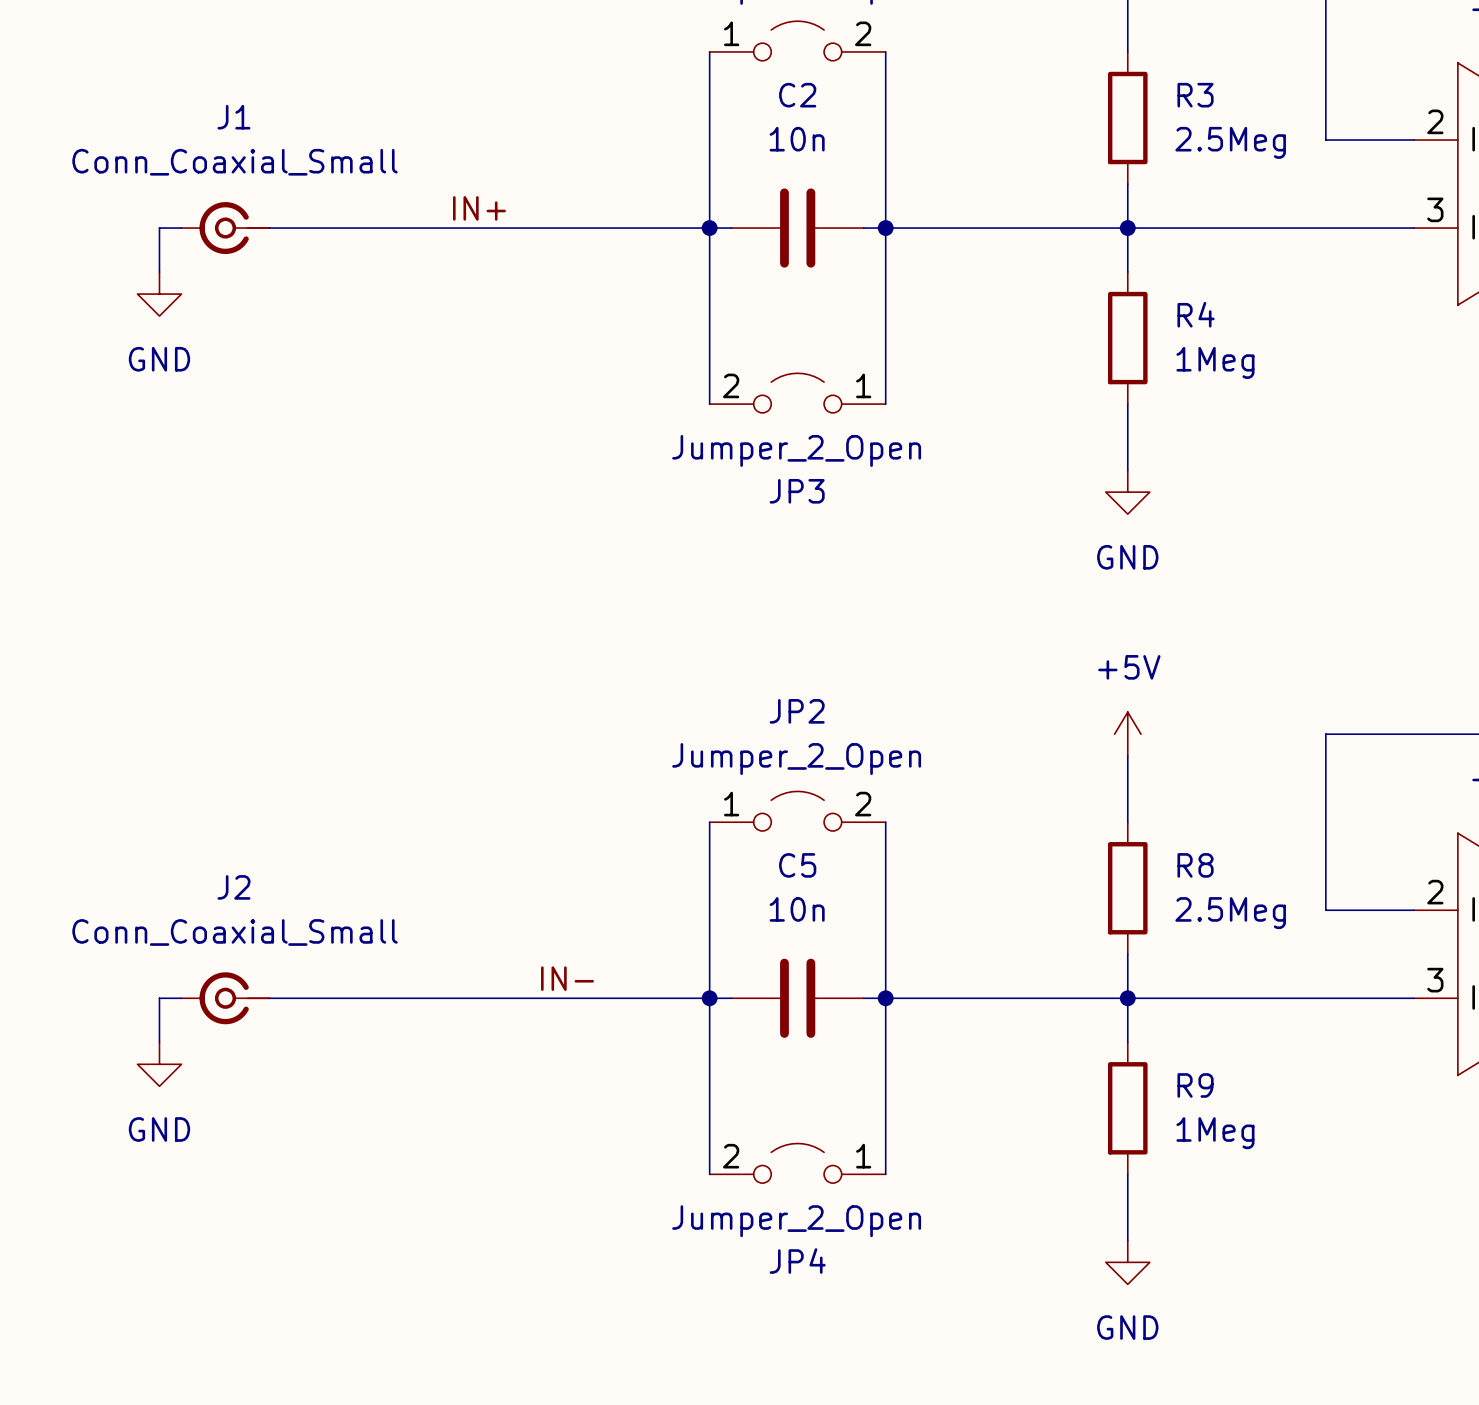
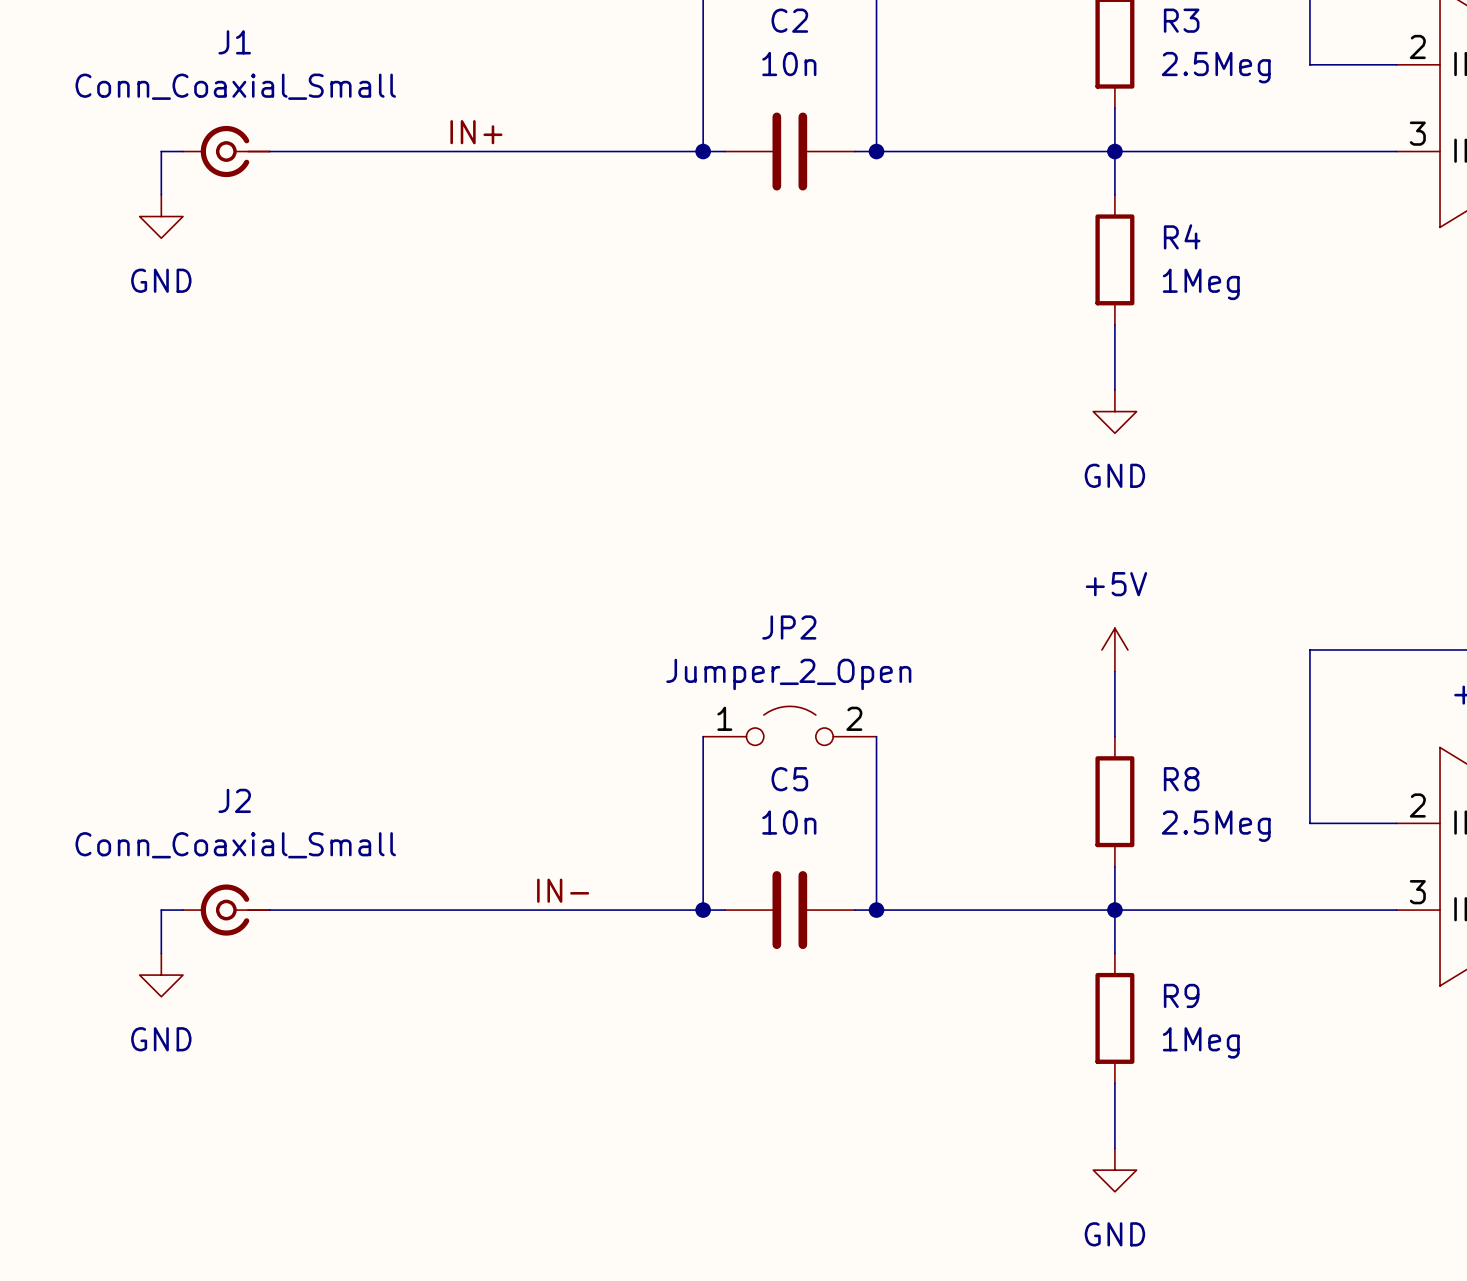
wire: (709, 228) (709, 404) -> none
wire: (885, 228) (885, 404) -> none
JP3: Jumper_2_Open (797, 393) -> none
wire: (709, 998) (709, 1174) -> none
wire: (885, 998) (885, 1174) -> none
JP4: Jumper_2_Open (797, 1163) -> none

